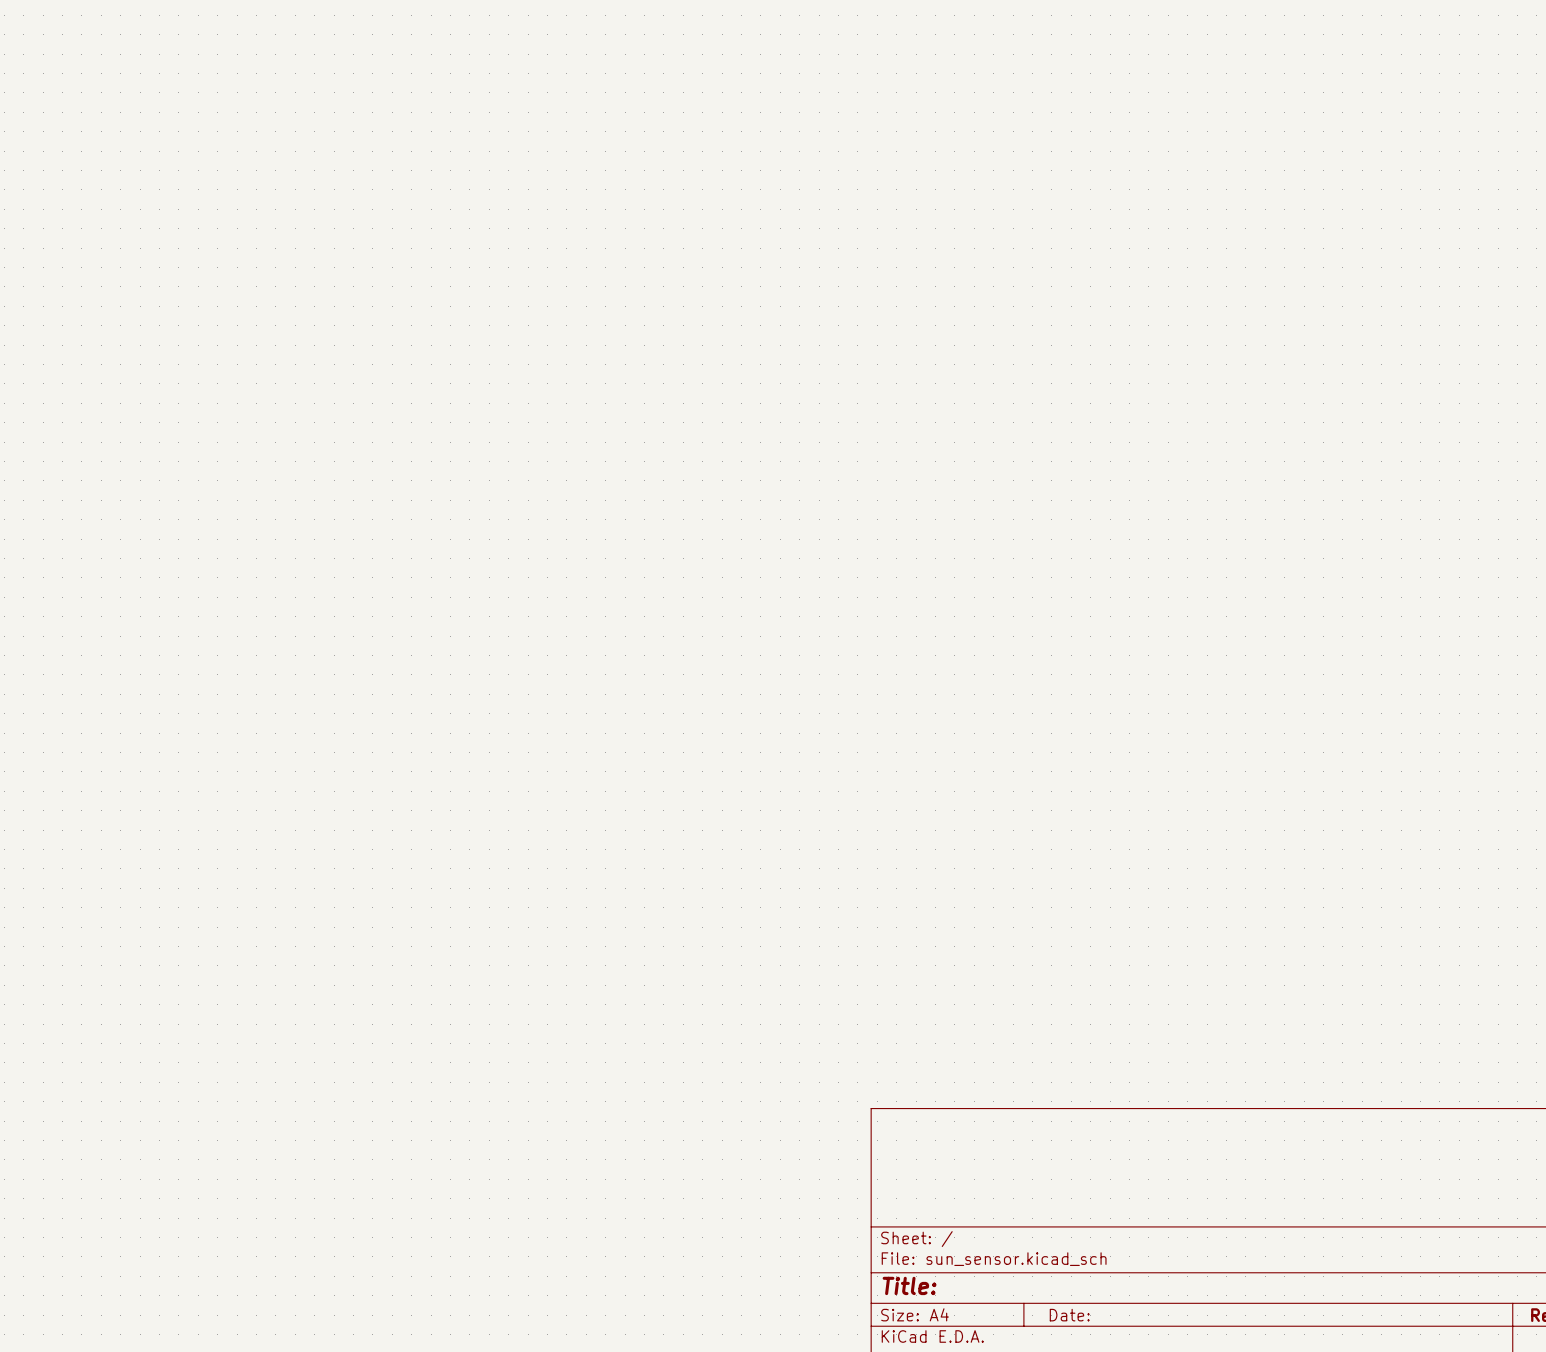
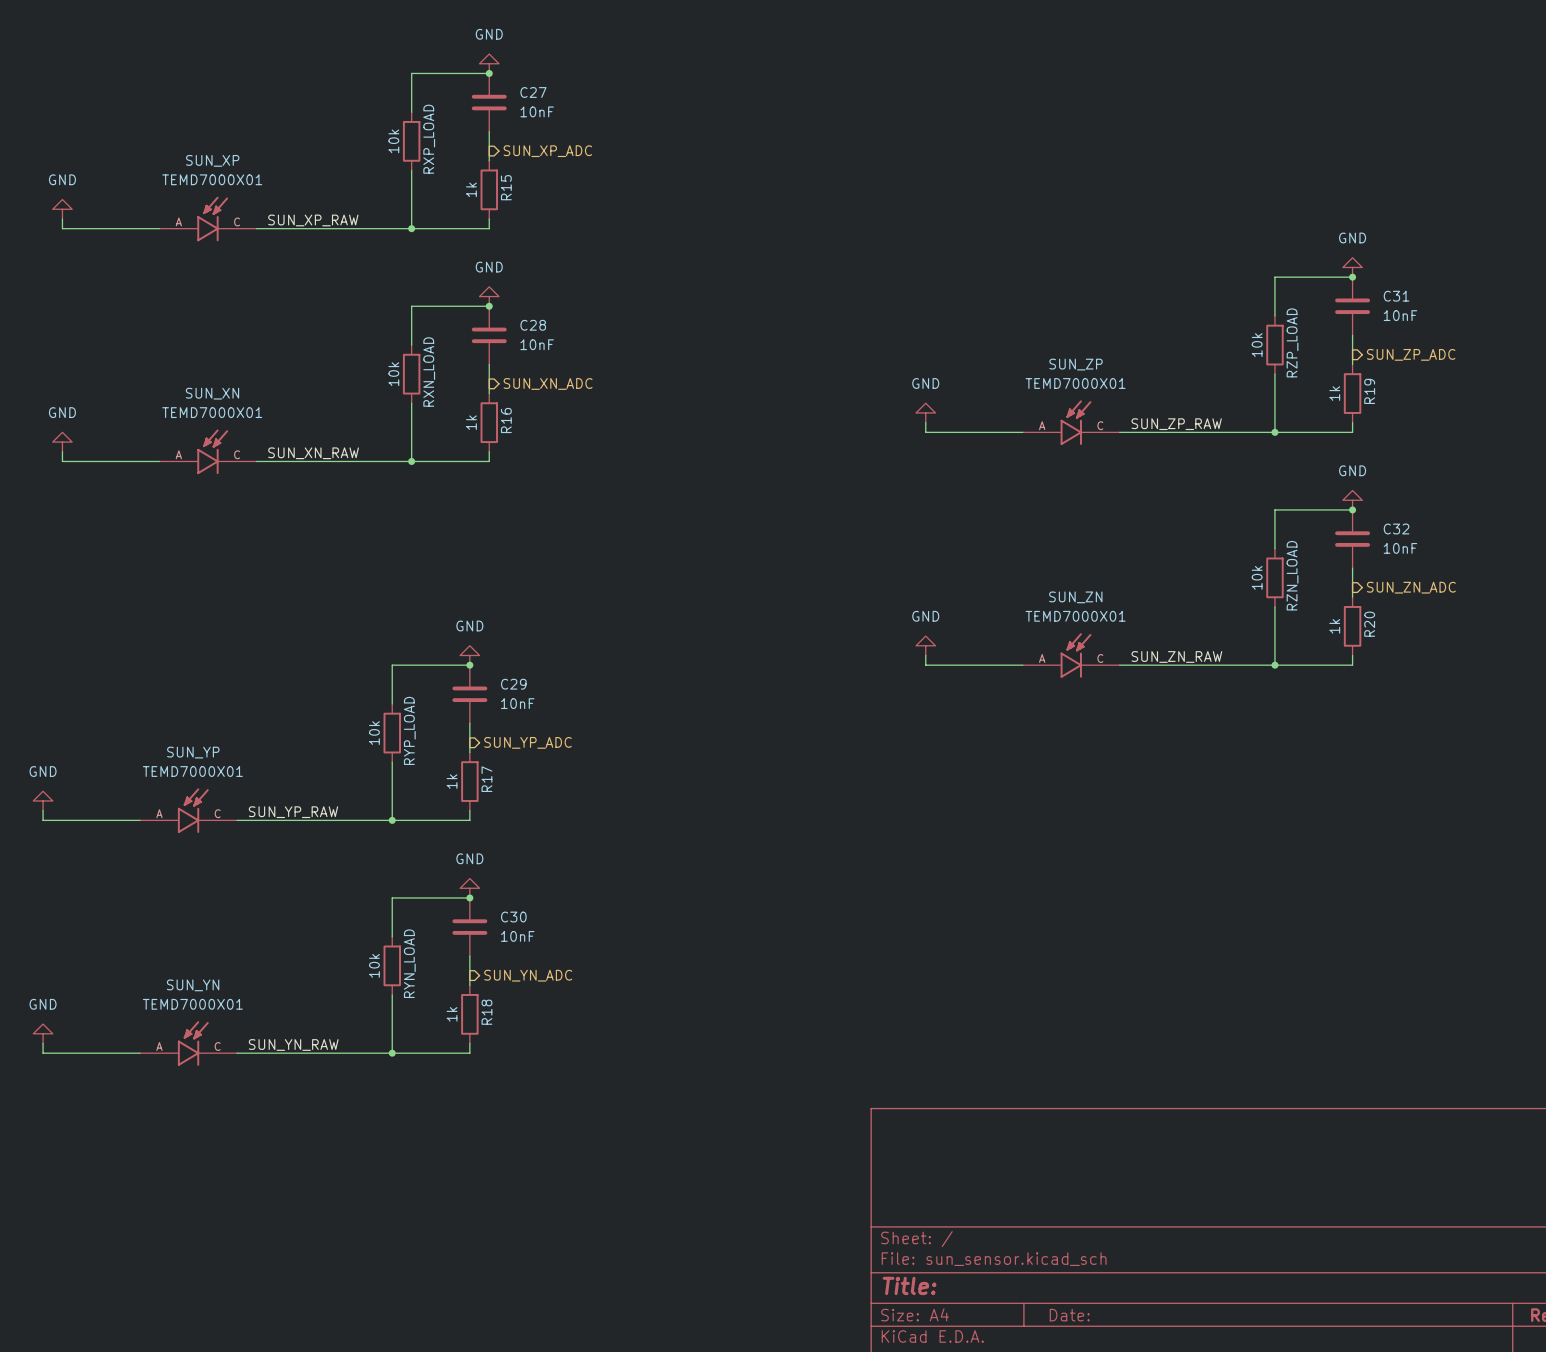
power symbol: none -> GND (489, 63)
wire: none -> (489, 73) (411, 73) (411, 112)
junction: none -> (489, 73)
C27: none -> 10nF (489, 102)
wire: none -> (489, 131) (489, 160)
RXP_LOAD: none -> 10k (411, 141)
hierarchical label: none -> SUN_XP_ADC (547, 151)
wire: none -> (411, 170) (411, 228)
R15: none -> 1k (489, 189)
power symbol: none -> GND (62, 209)
wire: none -> (62, 218) (62, 228) (159, 228)
SUN_XP: none -> TEMD7000X01 (207, 218)
wire: none -> (489, 218) (489, 228) (256, 228)
label: none -> SUN_XP_RAW (313, 220)
junction: none -> (411, 228)
power symbol: none -> GND (1352, 267)
wire: none -> (1352, 277) (1274, 277) (1274, 315)
junction: none -> (1352, 277)
power symbol: none -> GND (489, 296)
wire: none -> (489, 306) (411, 306) (411, 345)
junction: none -> (489, 306)
C31: none -> 10nF (1352, 306)
C28: none -> 10nF (489, 335)
wire: none -> (1352, 335) (1352, 364)
RZP_LOAD: none -> 10k (1274, 345)
hierarchical label: none -> SUN_ZP_ADC (1411, 354)
wire: none -> (489, 364) (489, 393)
RXN_LOAD: none -> 10k (411, 374)
wire: none -> (1274, 374) (1274, 432)
hierarchical label: none -> SUN_XN_ADC (548, 383)
R19: none -> 1k (1352, 393)
wire: none -> (411, 403) (411, 461)
power symbol: none -> GND (925, 412)
R16: none -> 1k (489, 422)
wire: none -> (925, 422) (925, 432) (1022, 432)
SUN_ZP: none -> TEMD7000X01 (1071, 422)
wire: none -> (1352, 422) (1352, 432) (1119, 432)
label: none -> SUN_ZP_RAW (1176, 424)
junction: none -> (1274, 432)
power symbol: none -> GND (62, 442)
wire: none -> (62, 451) (62, 461) (159, 461)
SUN_XN: none -> TEMD7000X01 (207, 451)
wire: none -> (489, 451) (489, 461) (256, 461)
label: none -> SUN_XN_RAW (313, 453)
junction: none -> (411, 461)
power symbol: none -> GND (1352, 500)
wire: none -> (1352, 509) (1274, 509) (1274, 548)
junction: none -> (1352, 509)
C32: none -> 10nF (1352, 539)
wire: none -> (1352, 568) (1352, 597)
RZN_LOAD: none -> 10k (1274, 577)
hierarchical label: none -> SUN_ZN_ADC (1411, 587)
wire: none -> (1274, 606) (1274, 665)
R20: none -> 1k (1352, 626)
power symbol: none -> GND (925, 645)
power symbol: none -> GND (469, 655)
wire: none -> (925, 655) (925, 665) (1022, 665)
SUN_ZN: none -> TEMD7000X01 (1071, 655)
wire: none -> (1352, 655) (1352, 665) (1119, 665)
label: none -> SUN_ZN_RAW (1176, 656)
wire: none -> (469, 665) (392, 665) (392, 703)
junction: none -> (469, 665)
junction: none -> (1274, 665)
C29: none -> 10nF (469, 694)
wire: none -> (469, 723) (469, 752)
RYP_LOAD: none -> 10k (392, 733)
hierarchical label: none -> SUN_YP_ADC (527, 742)
wire: none -> (392, 762) (392, 820)
R17: none -> 1k (469, 781)
power symbol: none -> GND (43, 800)
wire: none -> (43, 810) (43, 820) (140, 820)
SUN_YP: none -> TEMD7000X01 (188, 810)
wire: none -> (469, 810) (469, 820) (237, 820)
label: none -> SUN_YP_RAW (293, 812)
junction: none -> (392, 820)
power symbol: none -> GND (469, 888)
wire: none -> (469, 897) (392, 897) (392, 936)
junction: none -> (469, 897)
C30: none -> 10nF (469, 927)
wire: none -> (469, 956) (469, 985)
RYN_LOAD: none -> 10k (392, 965)
hierarchical label: none -> SUN_YN_ADC (528, 975)
wire: none -> (392, 994) (392, 1053)
R18: none -> 1k (469, 1014)
power symbol: none -> GND (43, 1033)
wire: none -> (43, 1043) (43, 1053) (140, 1053)
SUN_YN: none -> TEMD7000X01 (188, 1043)
wire: none -> (469, 1043) (469, 1053) (237, 1053)
label: none -> SUN_YN_RAW (293, 1044)
junction: none -> (392, 1053)

